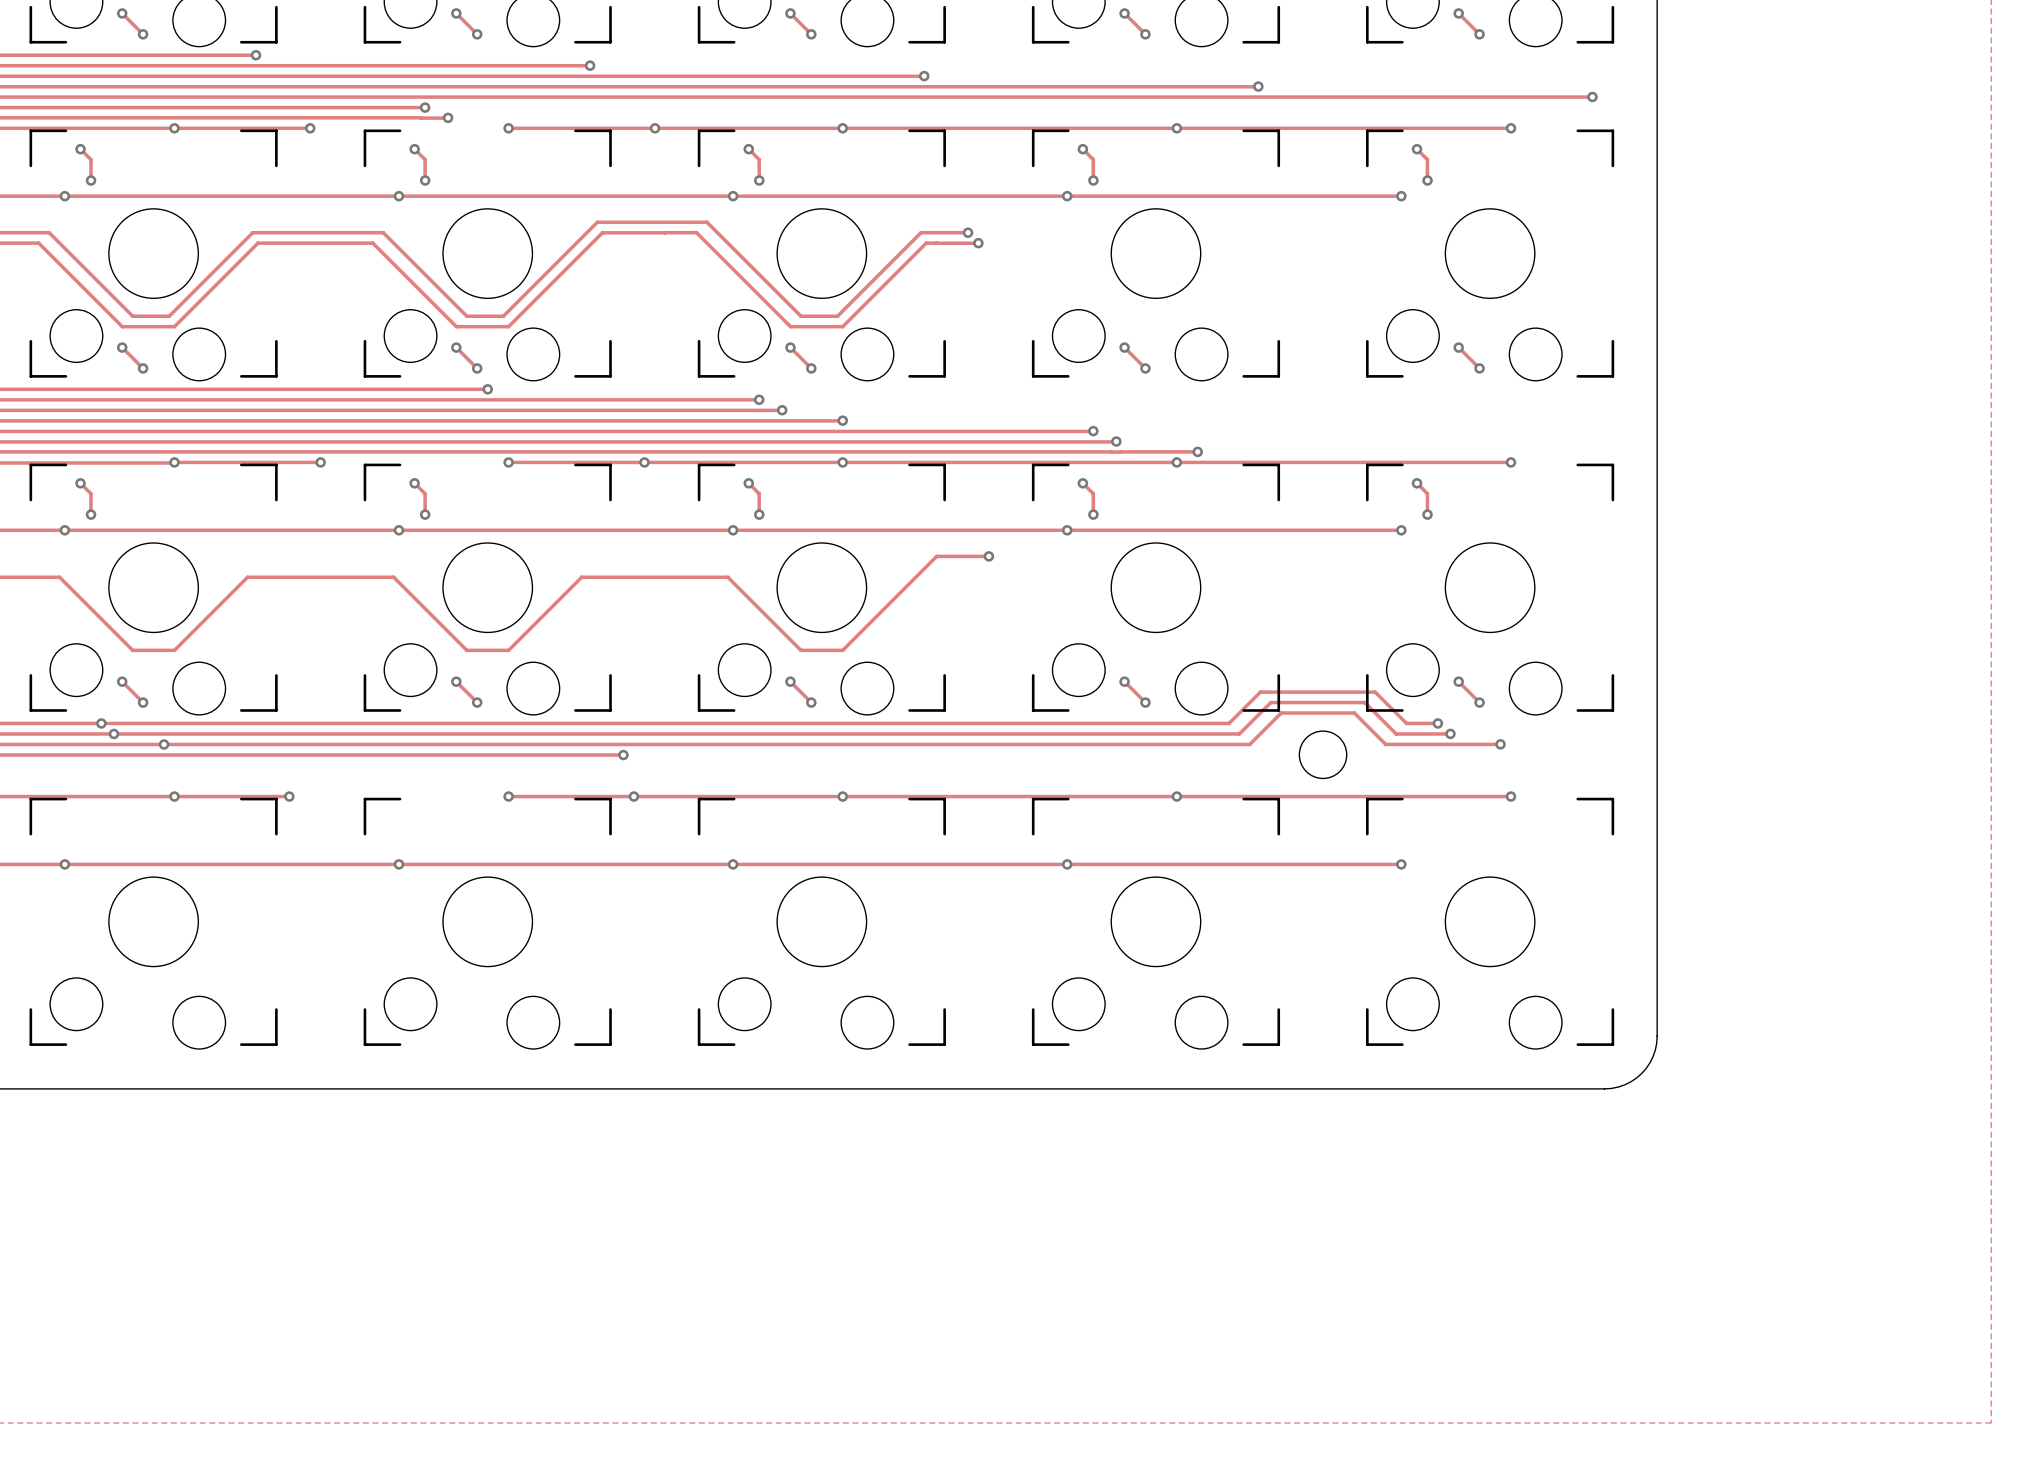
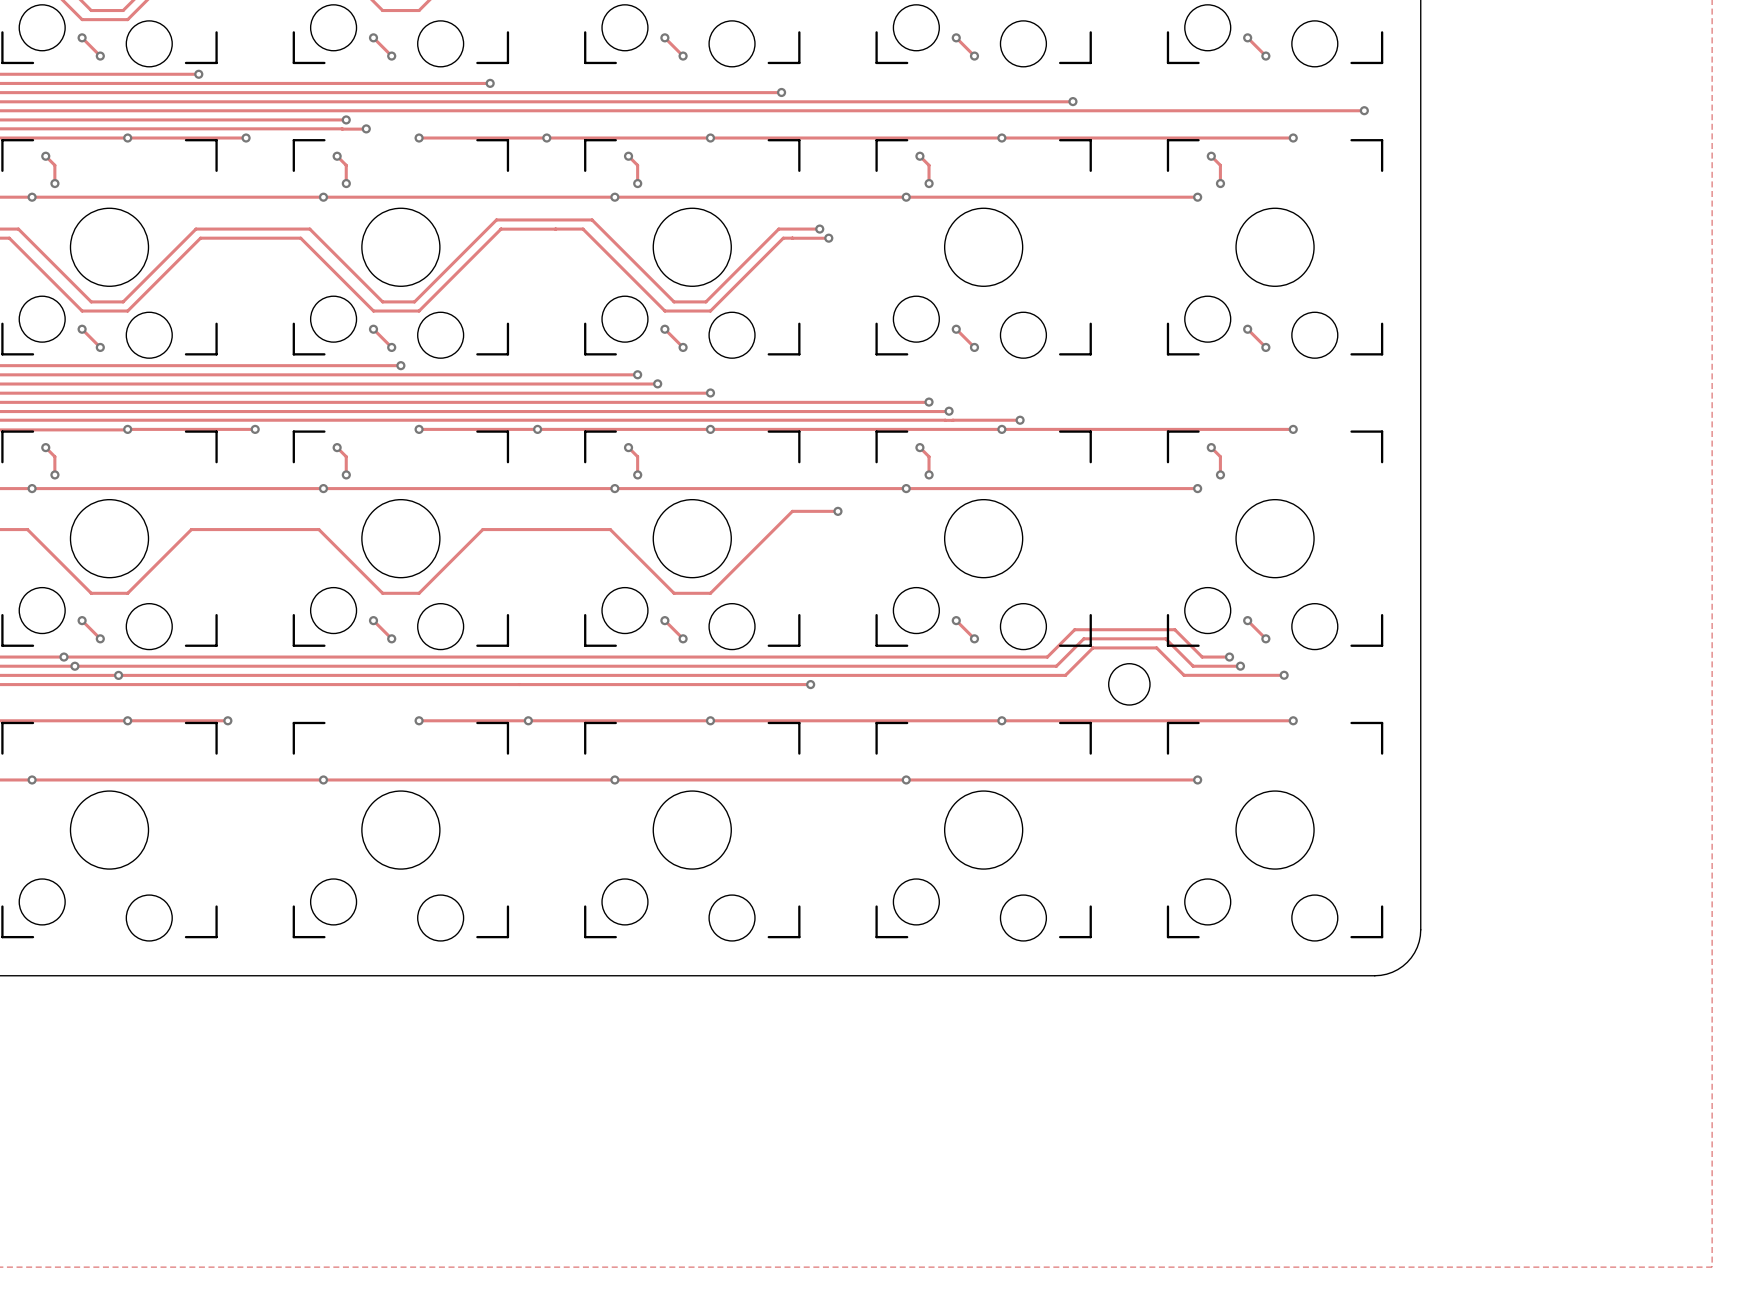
track: none -> (519, 684) (810, 684)
via: (623, 755) -> none
via: none -> (810, 684)

